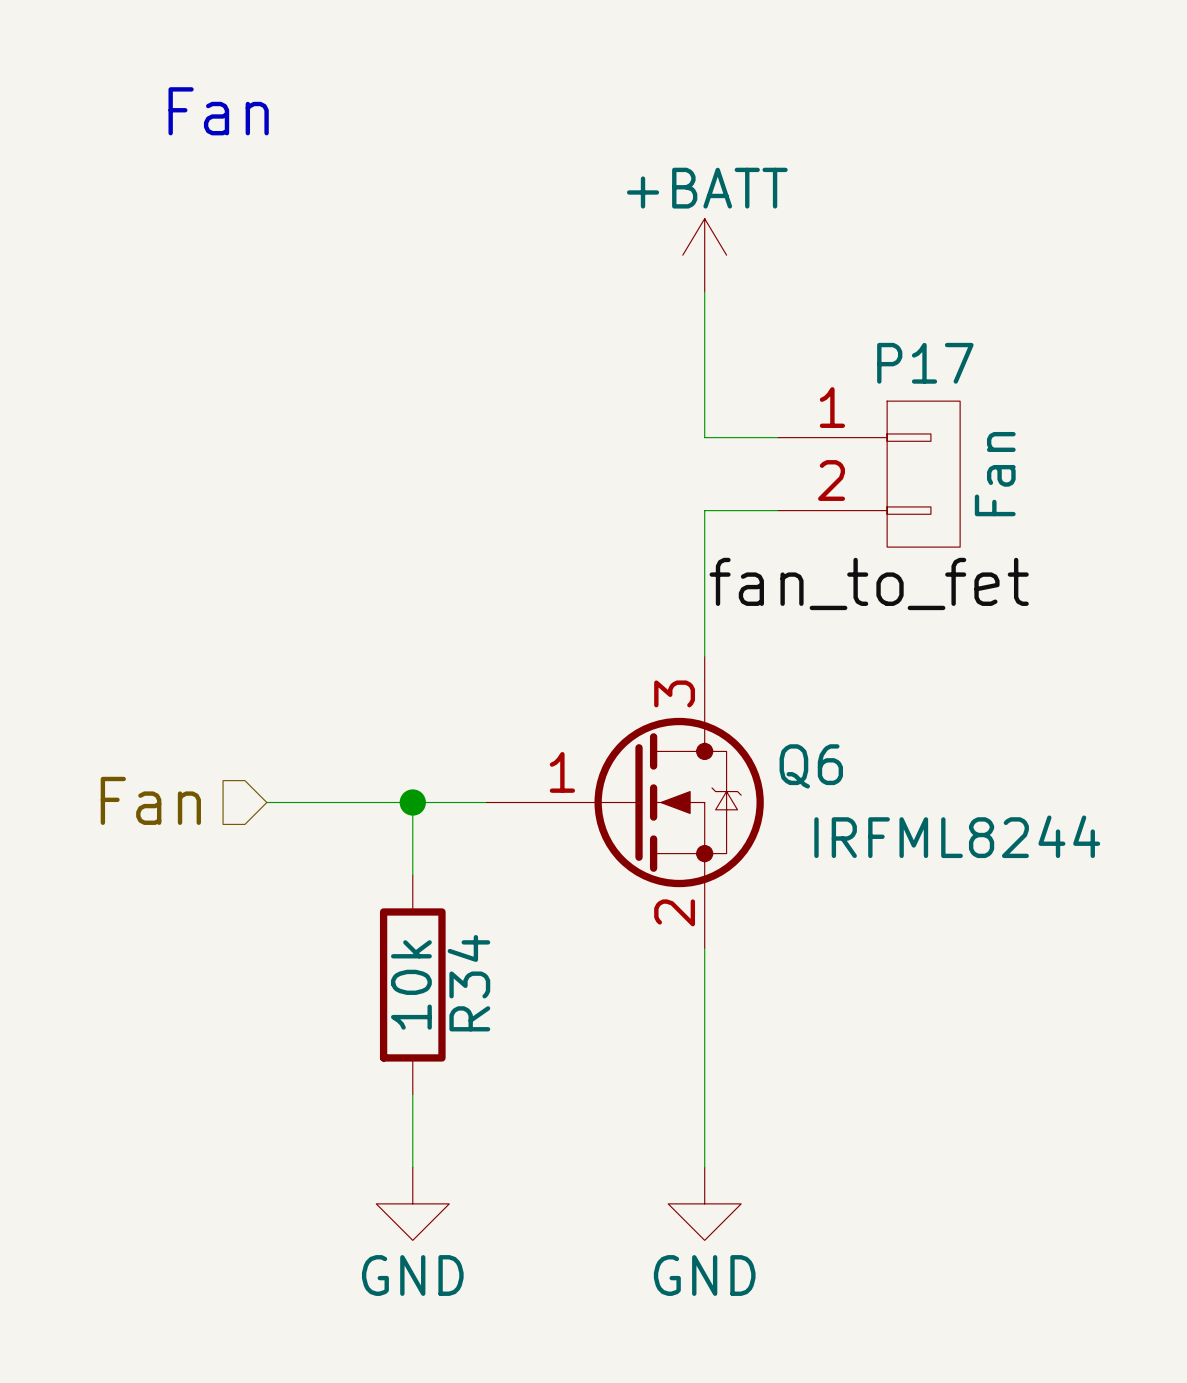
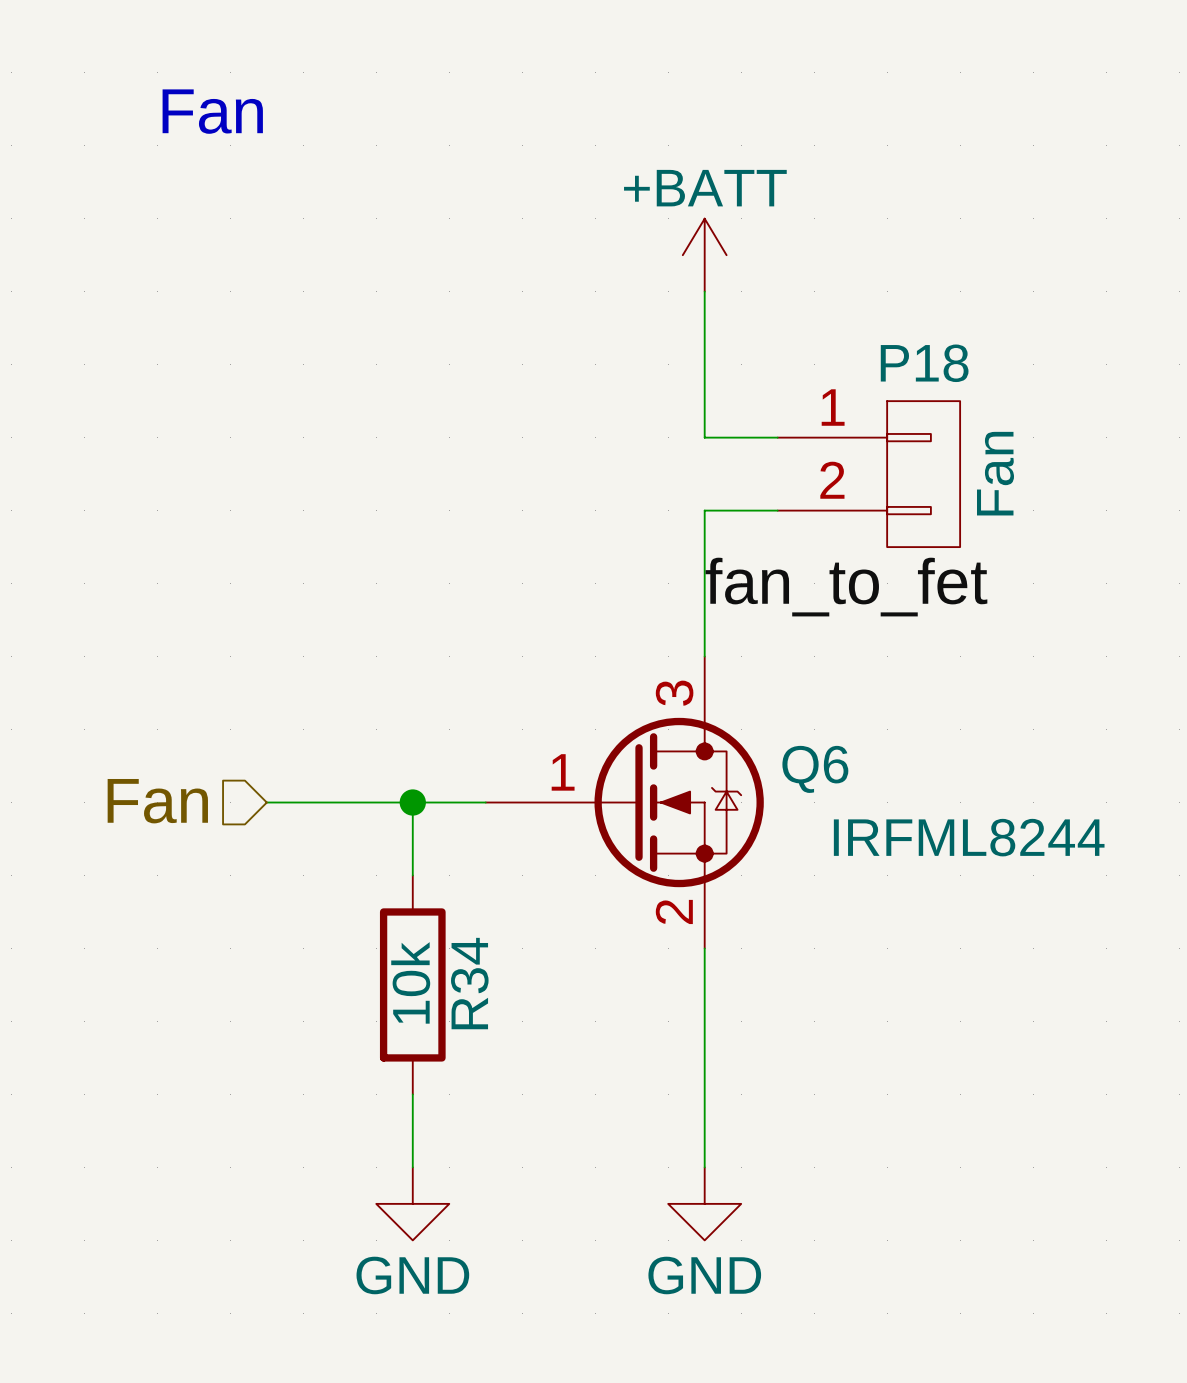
P17 name: P17 (925, 363) -> P18 (924, 363)

